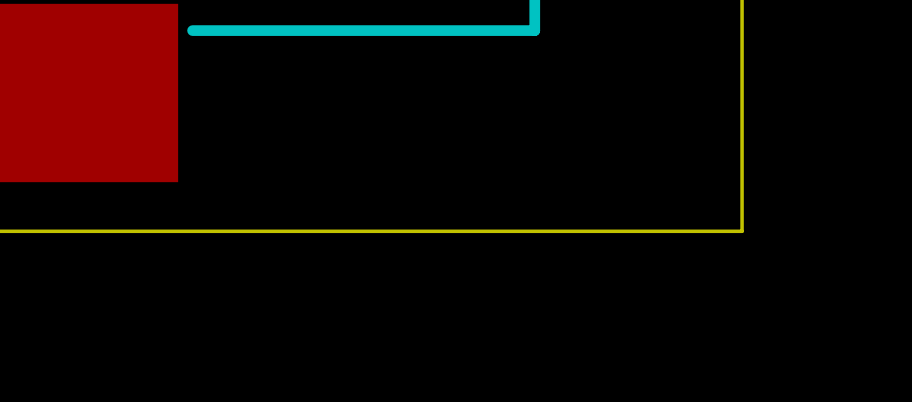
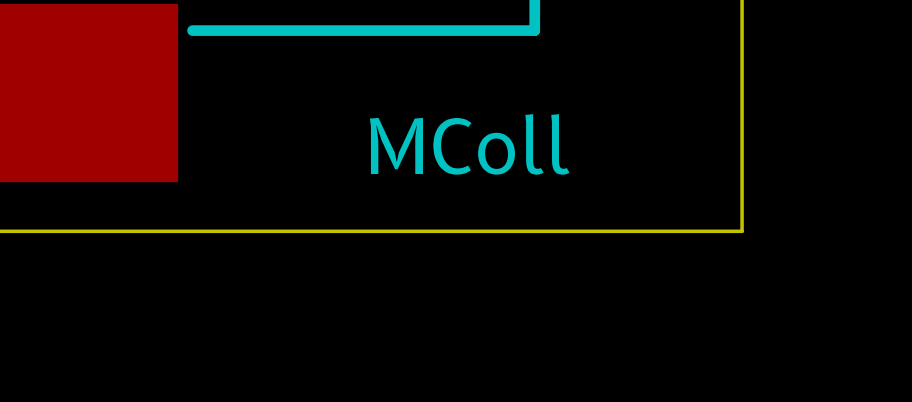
text: none -> MColl (469, 144)

